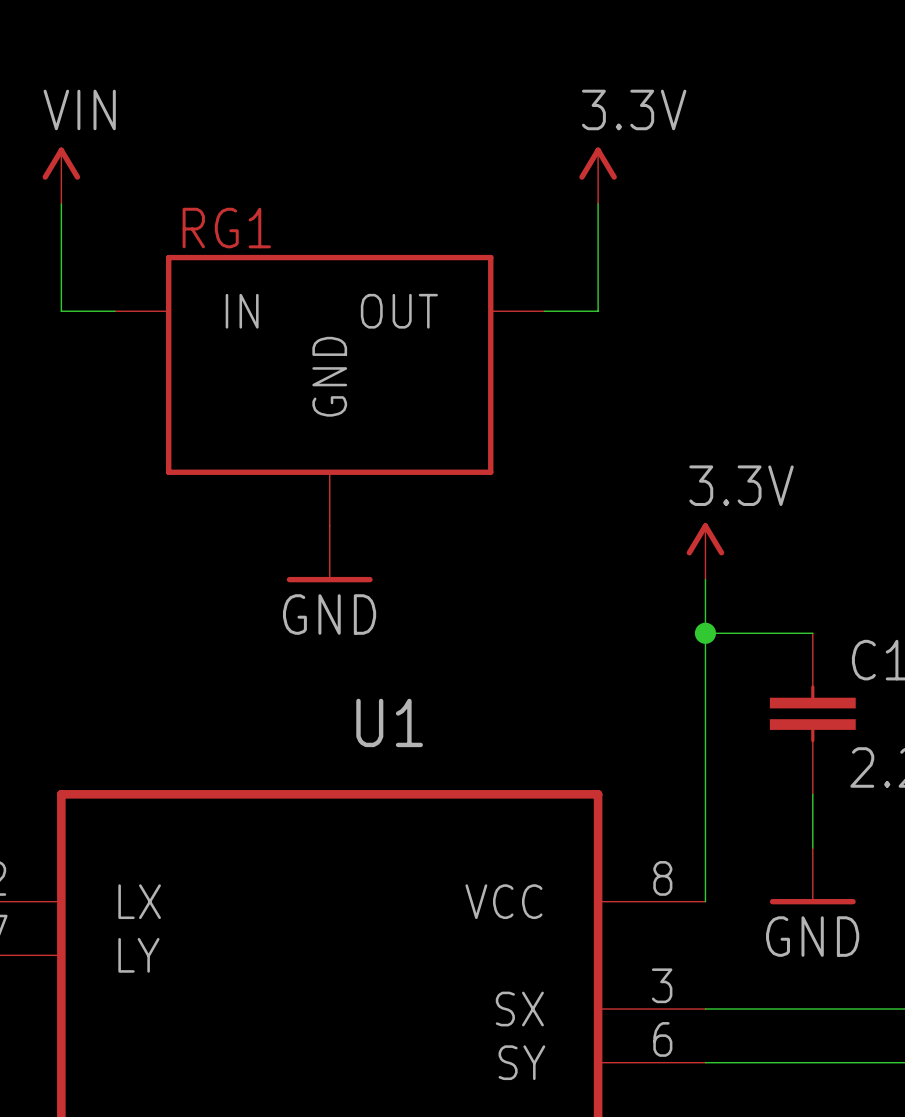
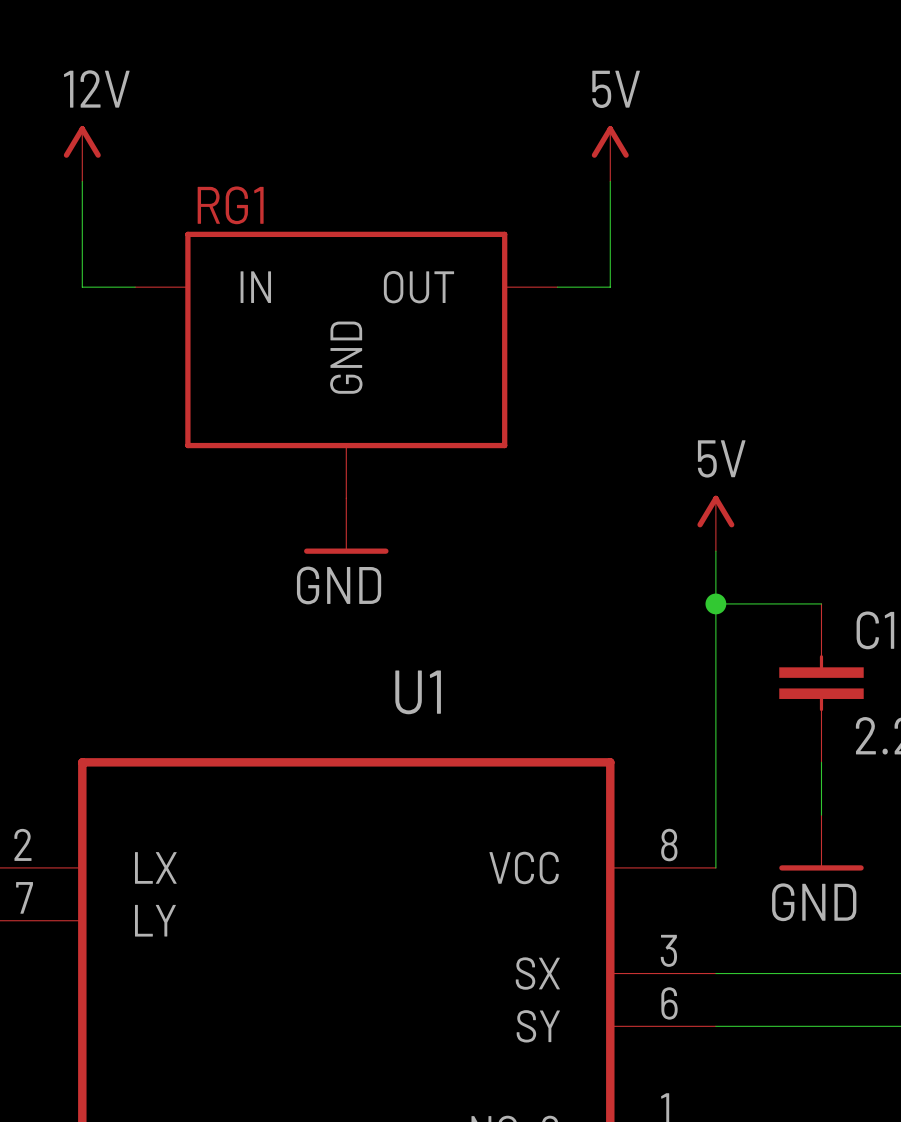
power symbol: VIN (61, 175) -> 12V (82, 153)
power symbol: 3.3V (598, 175) -> 5V (610, 153)
power symbol: 3.3V (705, 551) -> 5V (715, 523)

